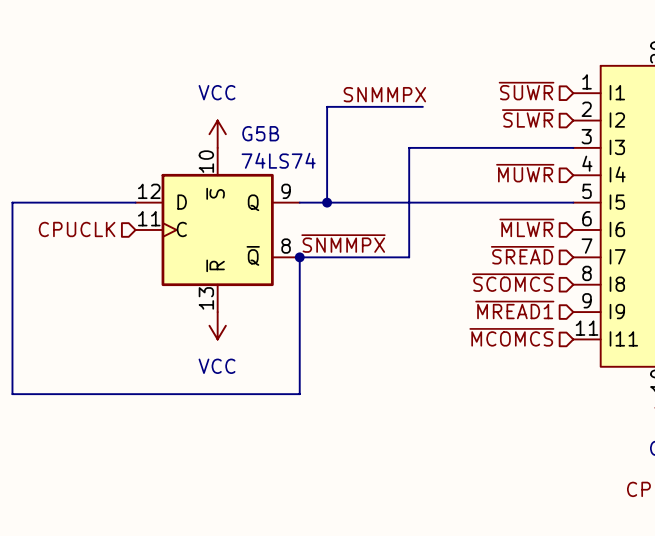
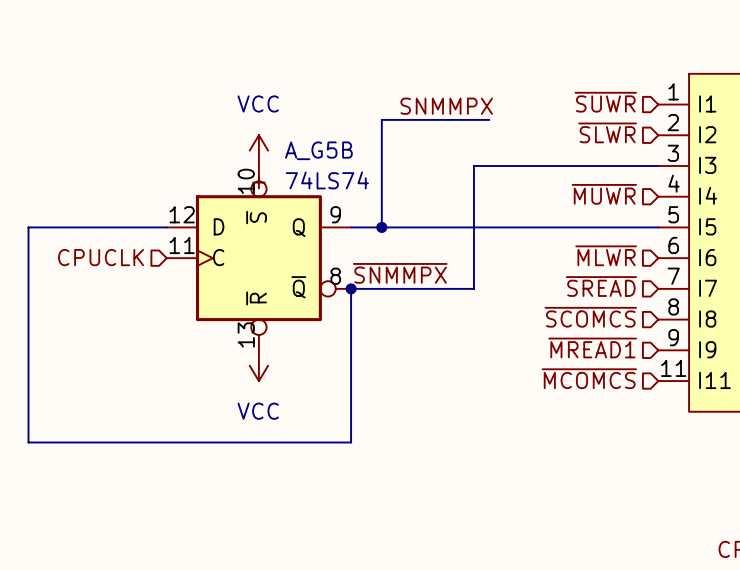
G5B: 74LS74 (217, 229) -> none
A_G5B: none -> 74LS74 (258, 258)

